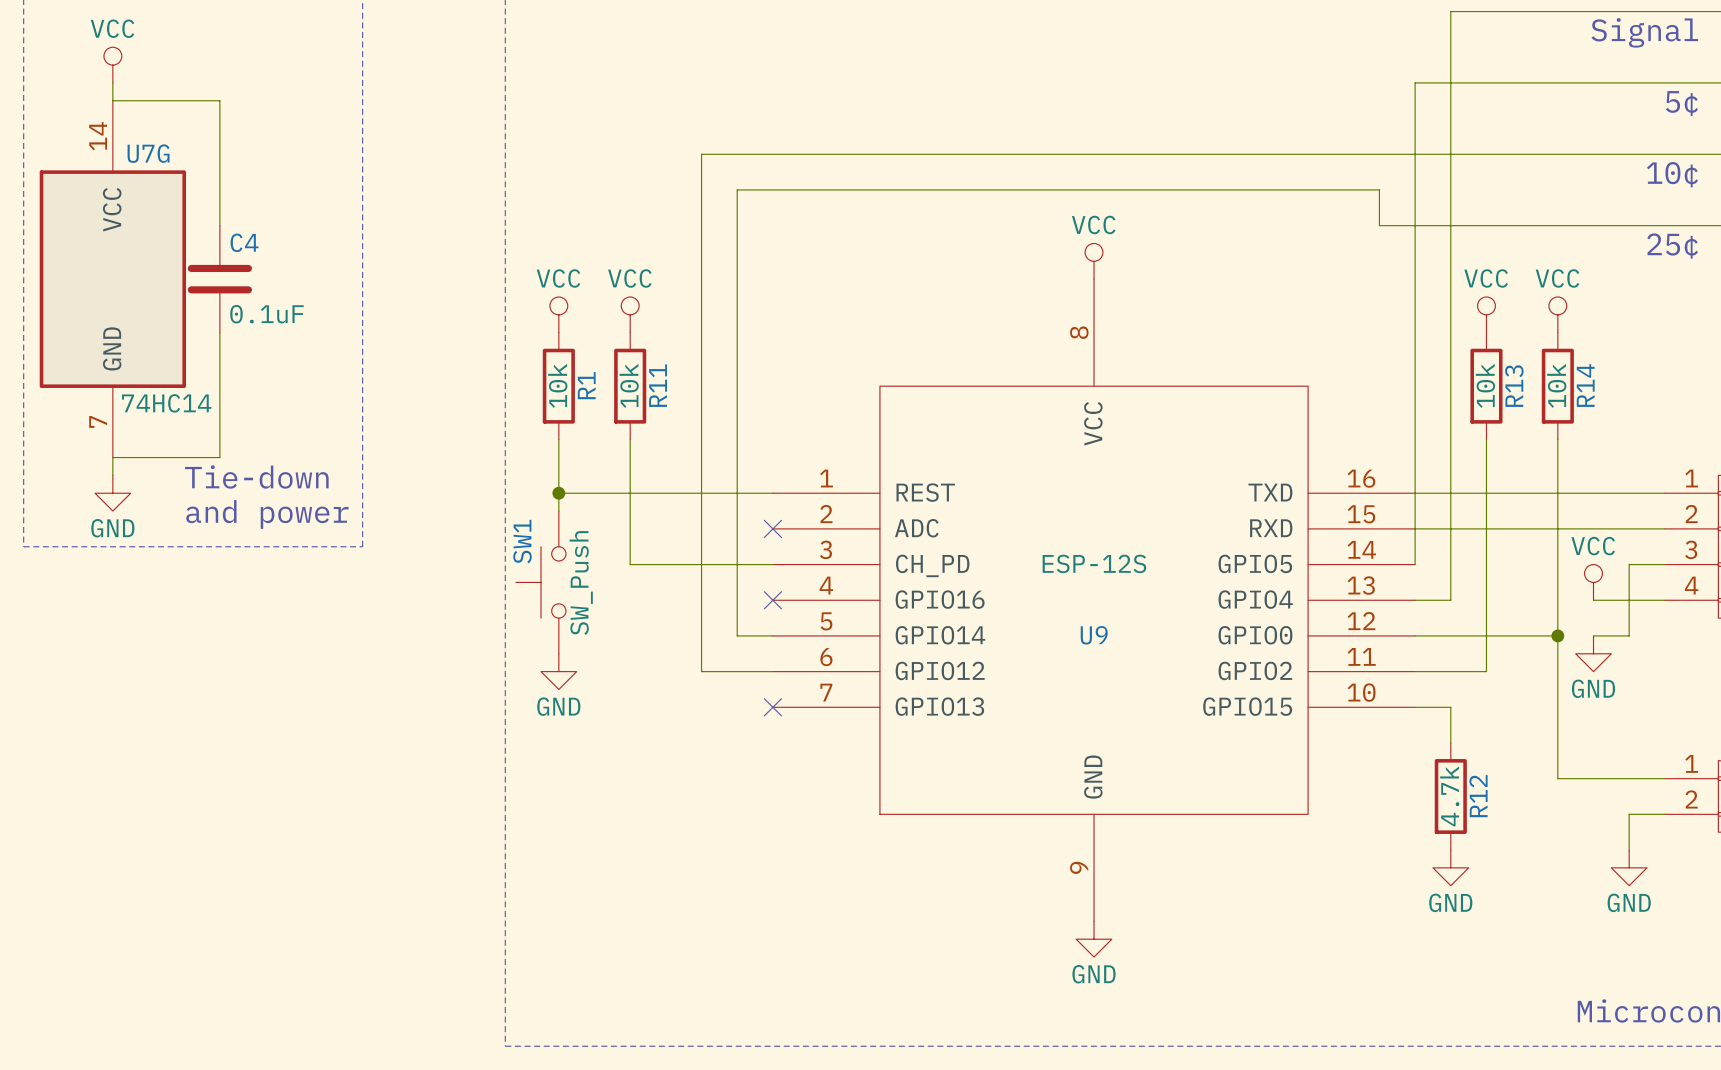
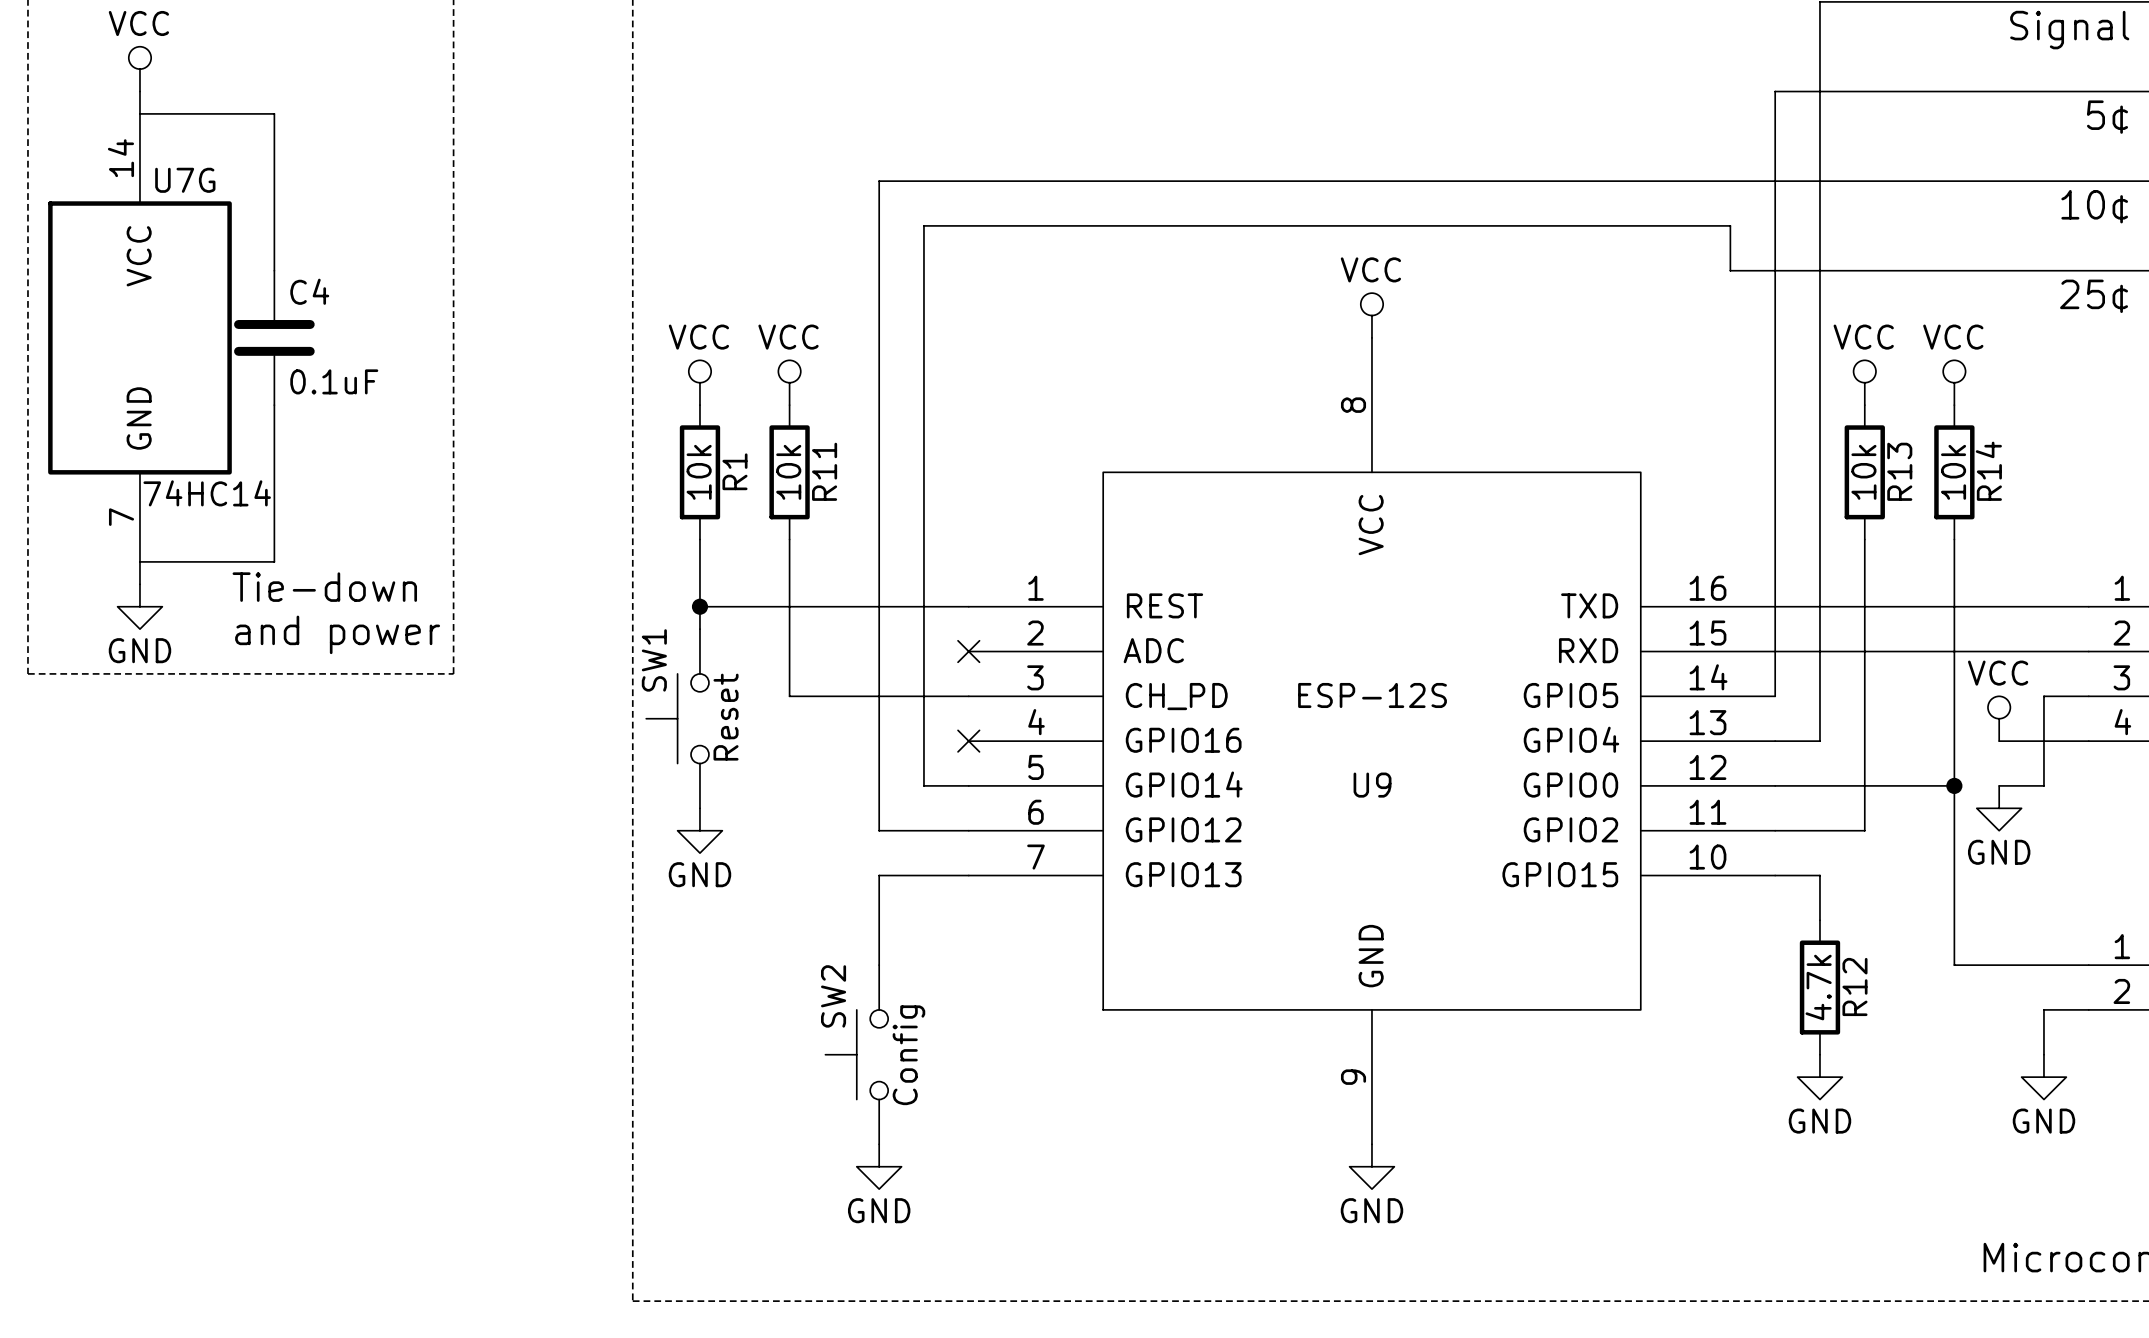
SW1 value: SW_Push (581, 583) -> Reset (726, 717)
wire: none -> (968, 875) (879, 875) (879, 965)
no-connect mark: (772, 707) -> none
SW2: none -> Config (856, 1054)
power symbol: none -> GND (879, 1166)

